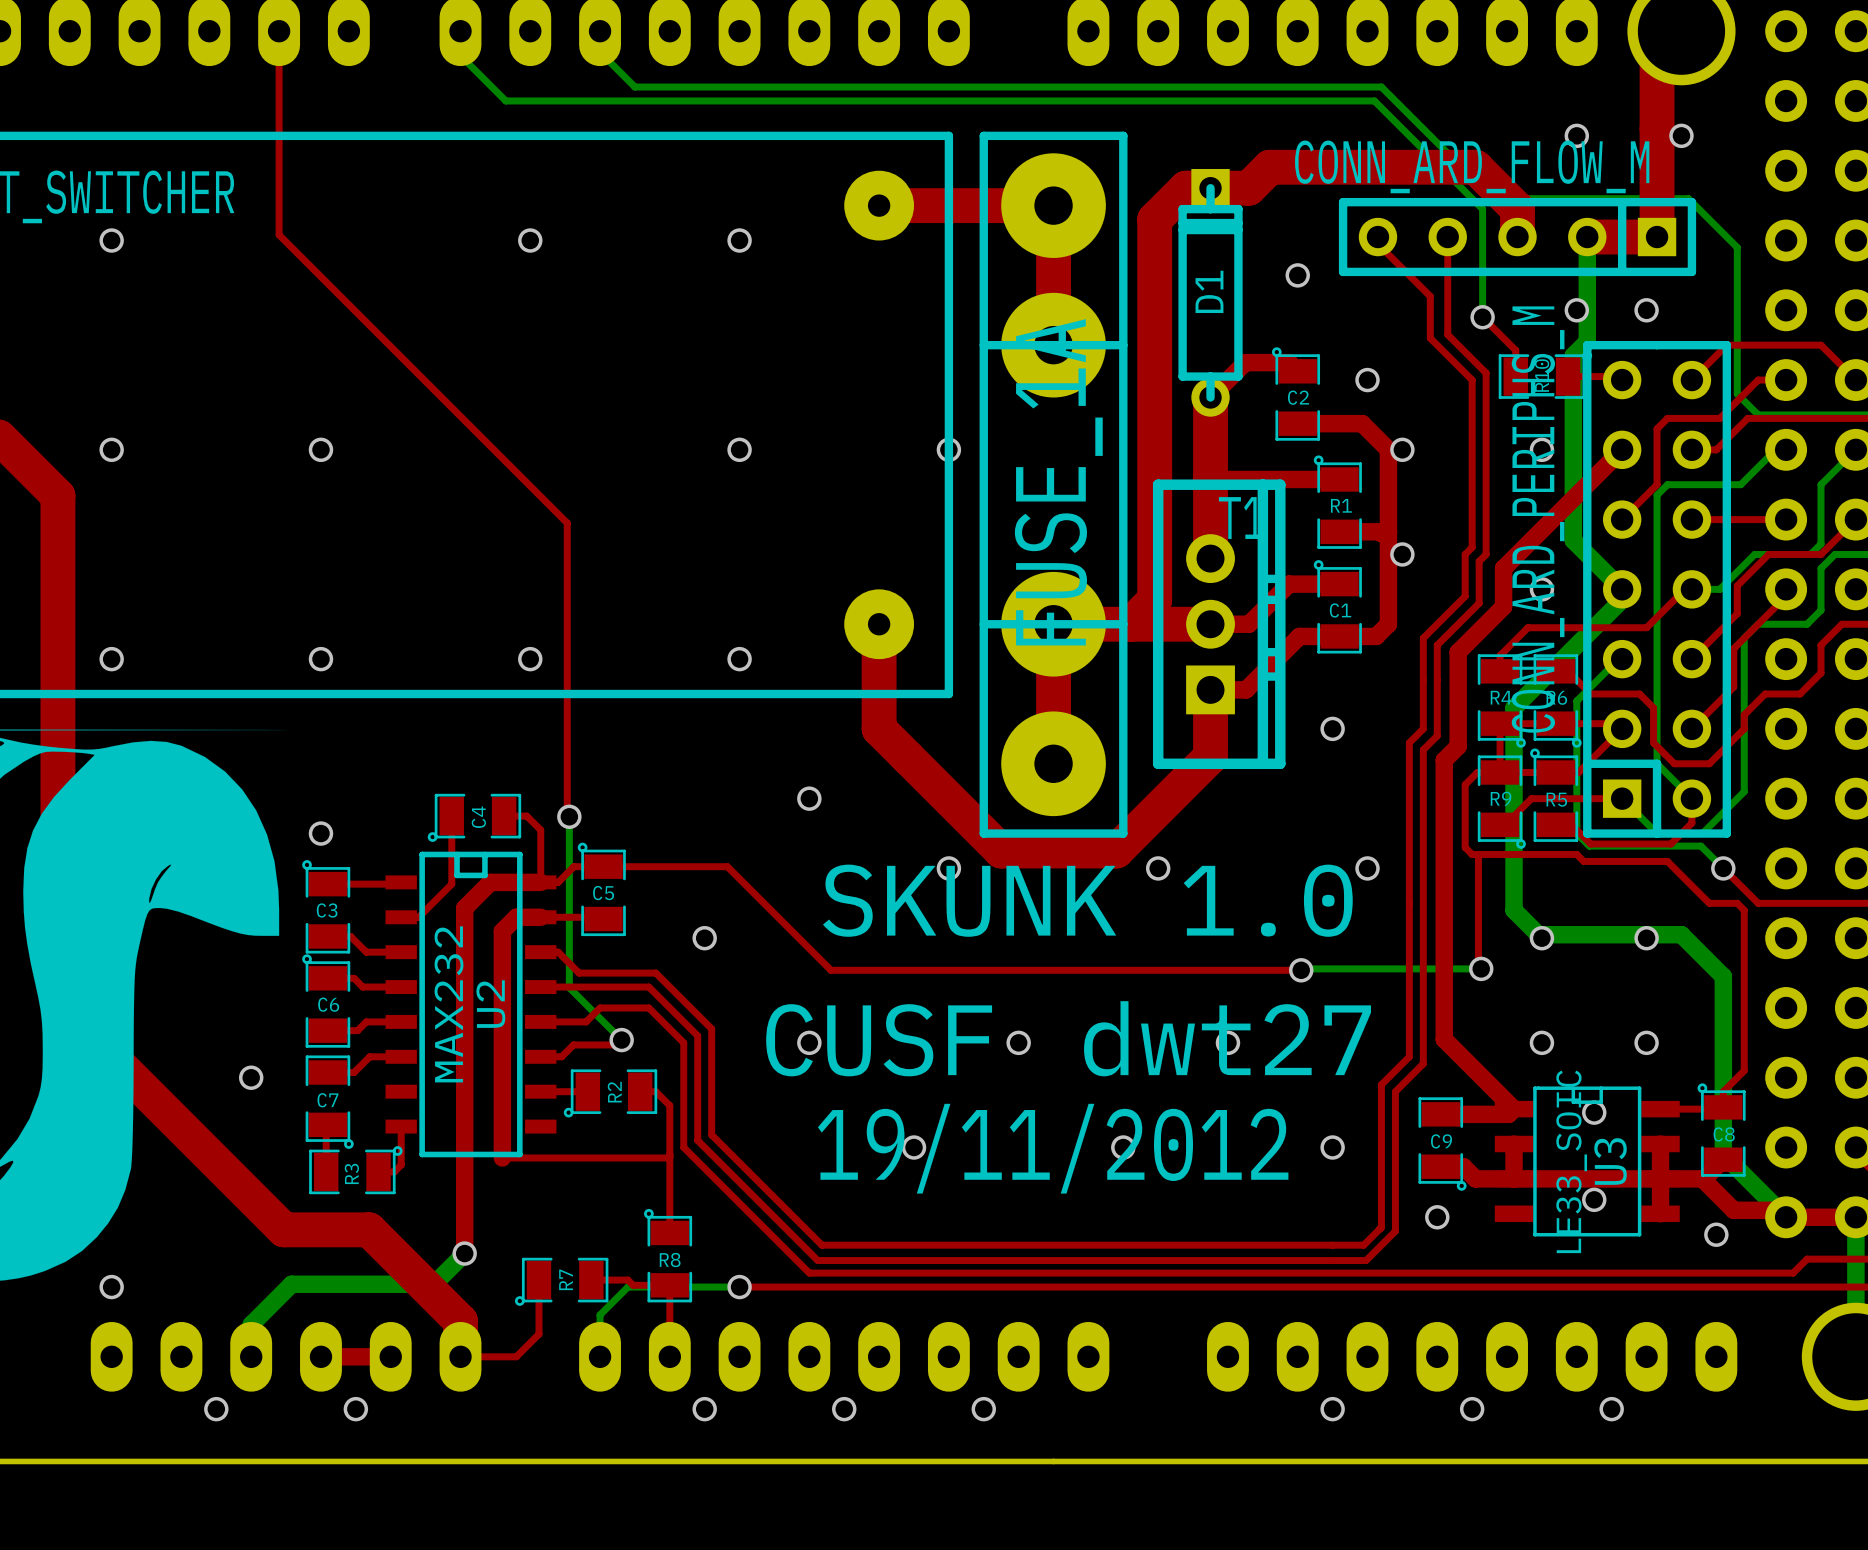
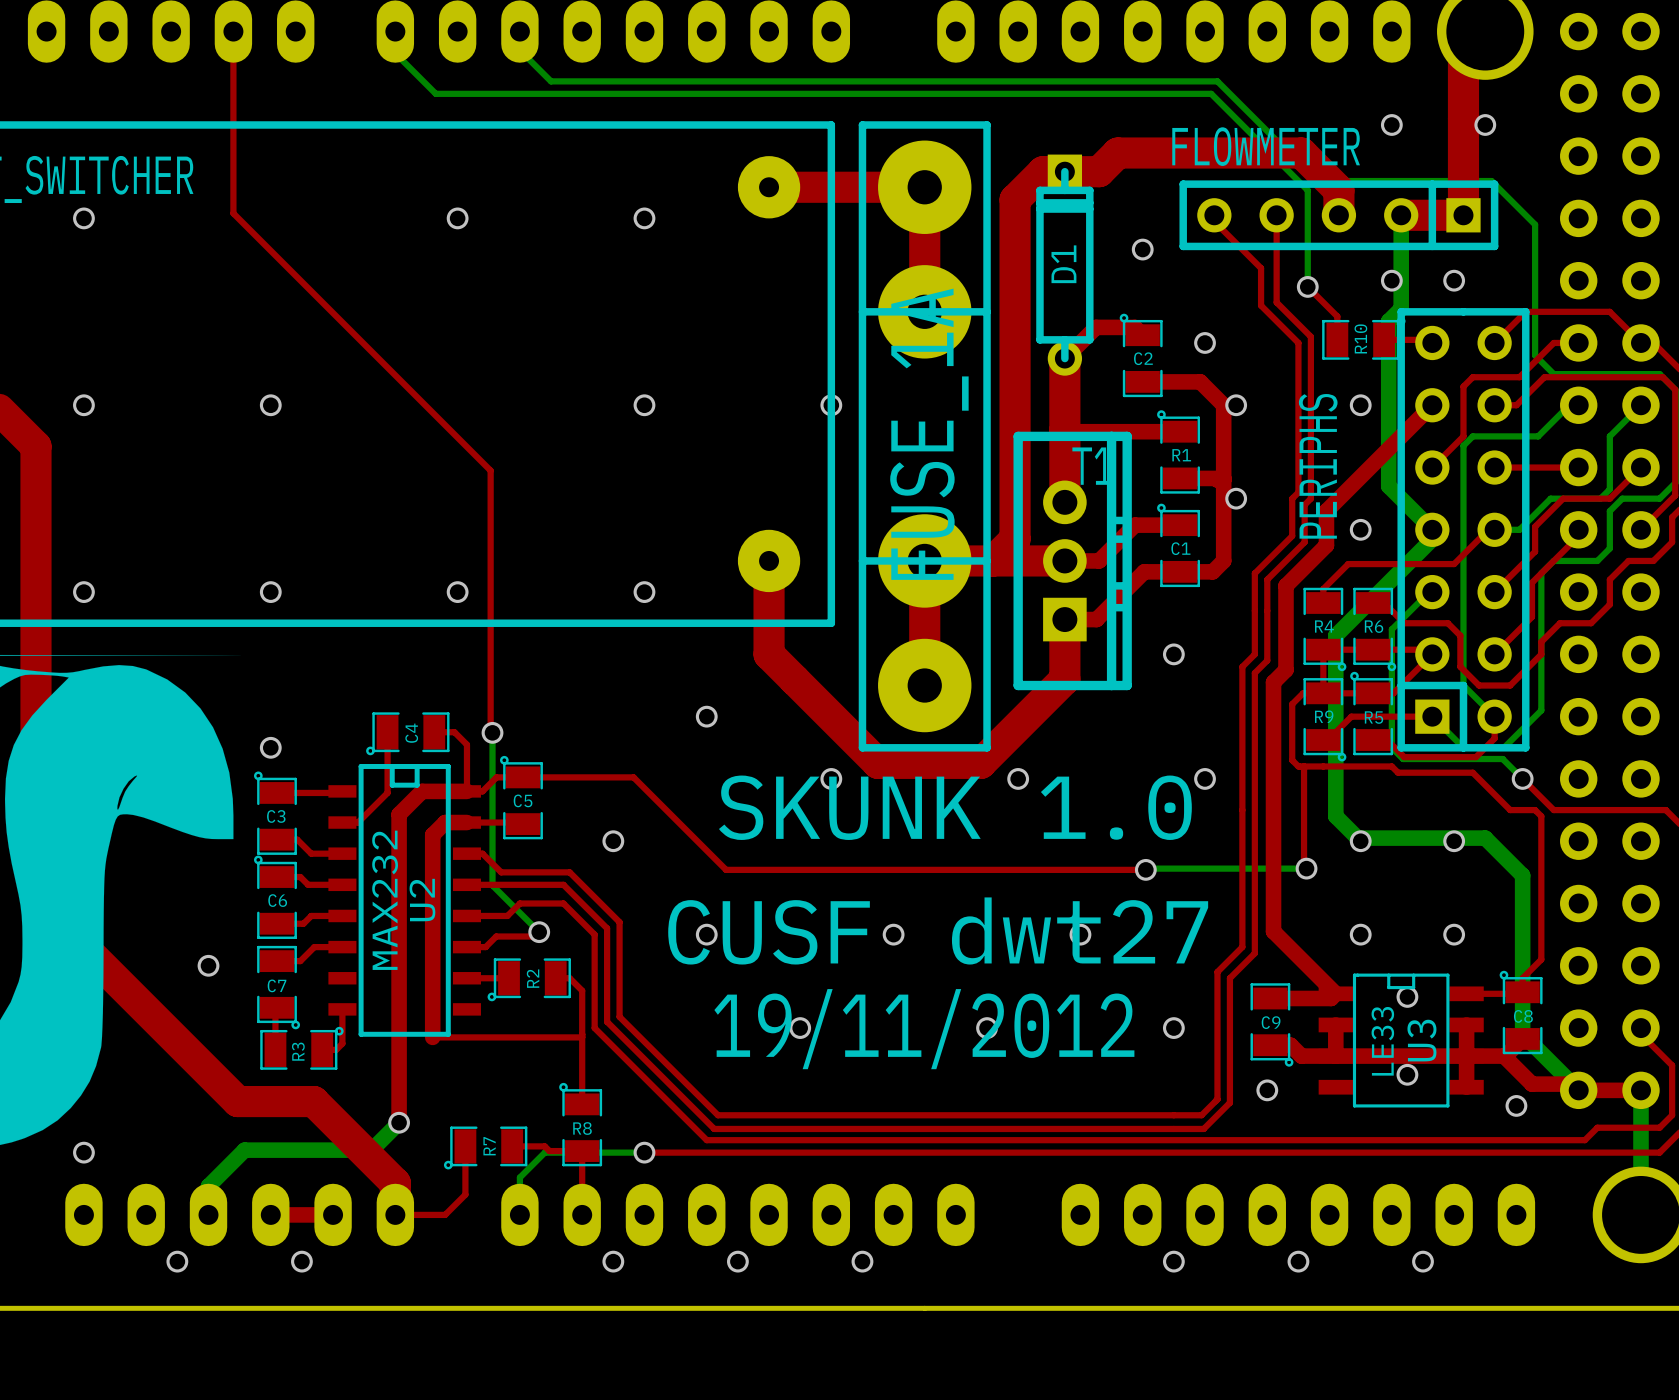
part value: CONN_ARD_FLOW_M (1472, 166) -> FLOWMETER (1266, 146)
part value: CONN_ARD_PERIPHS_M (1538, 519) -> PERIPHS (1318, 466)
U3 value: LE33_SOIC (1571, 1161) -> LE33 (1382, 1041)

